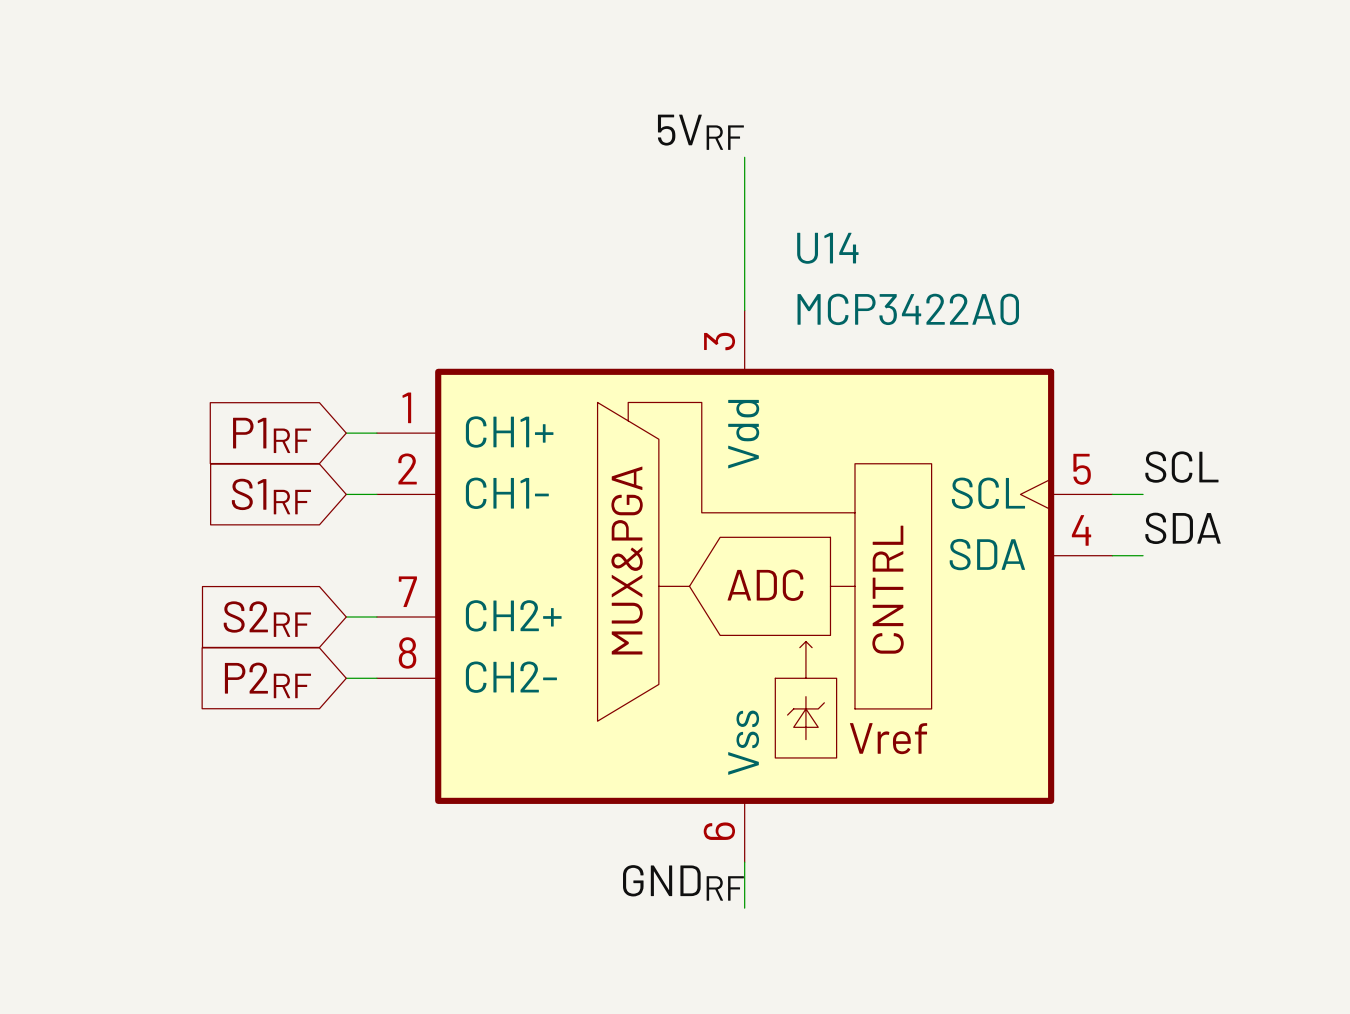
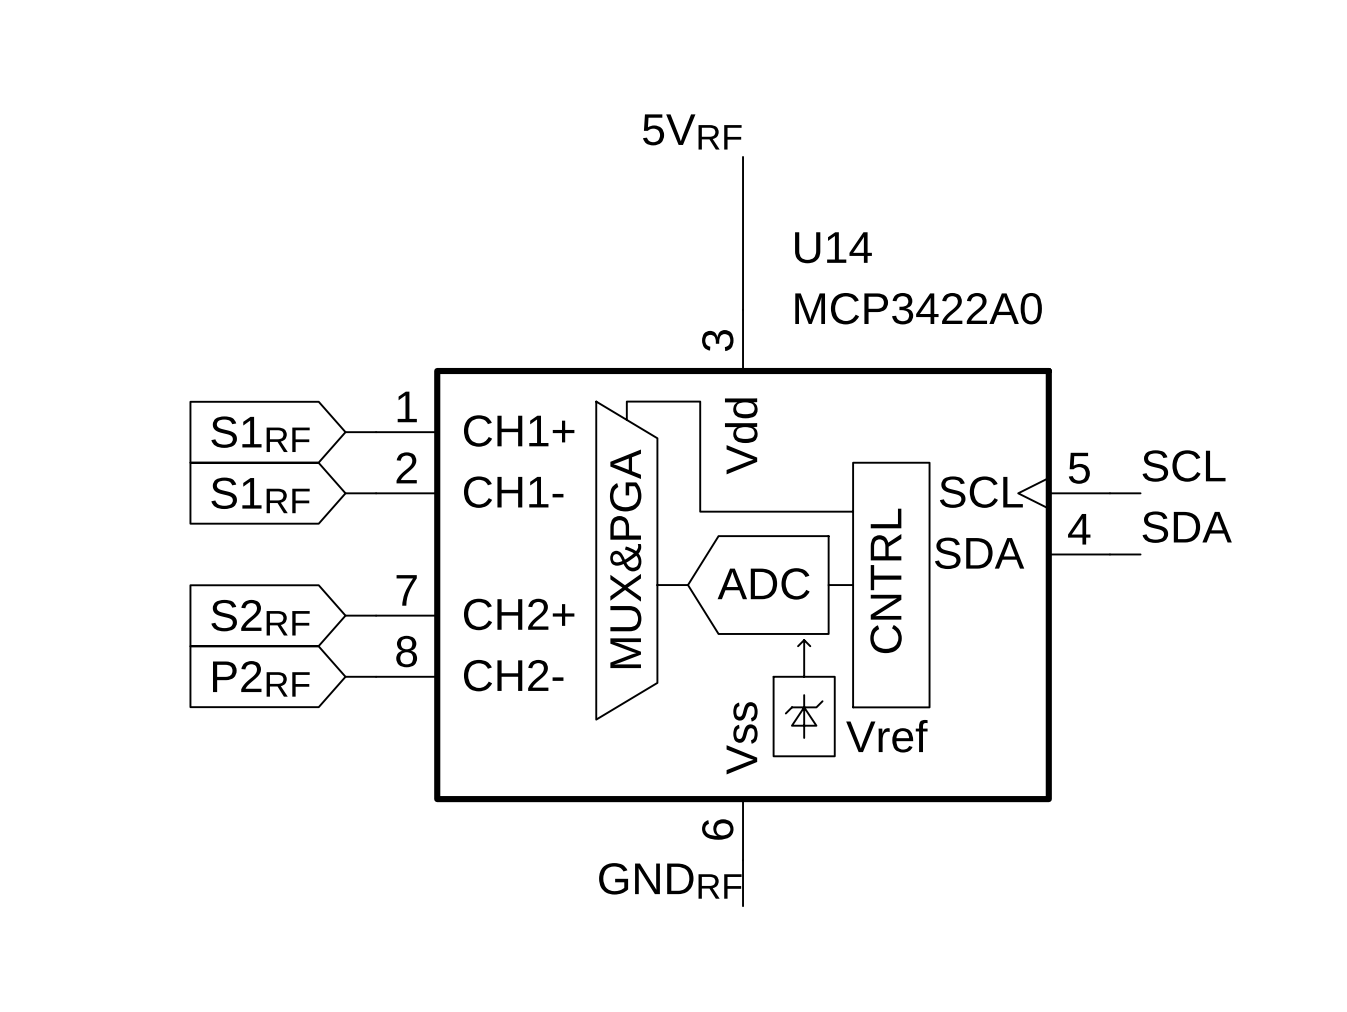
global label: P1RF (272, 435) -> S1RF (260, 434)

